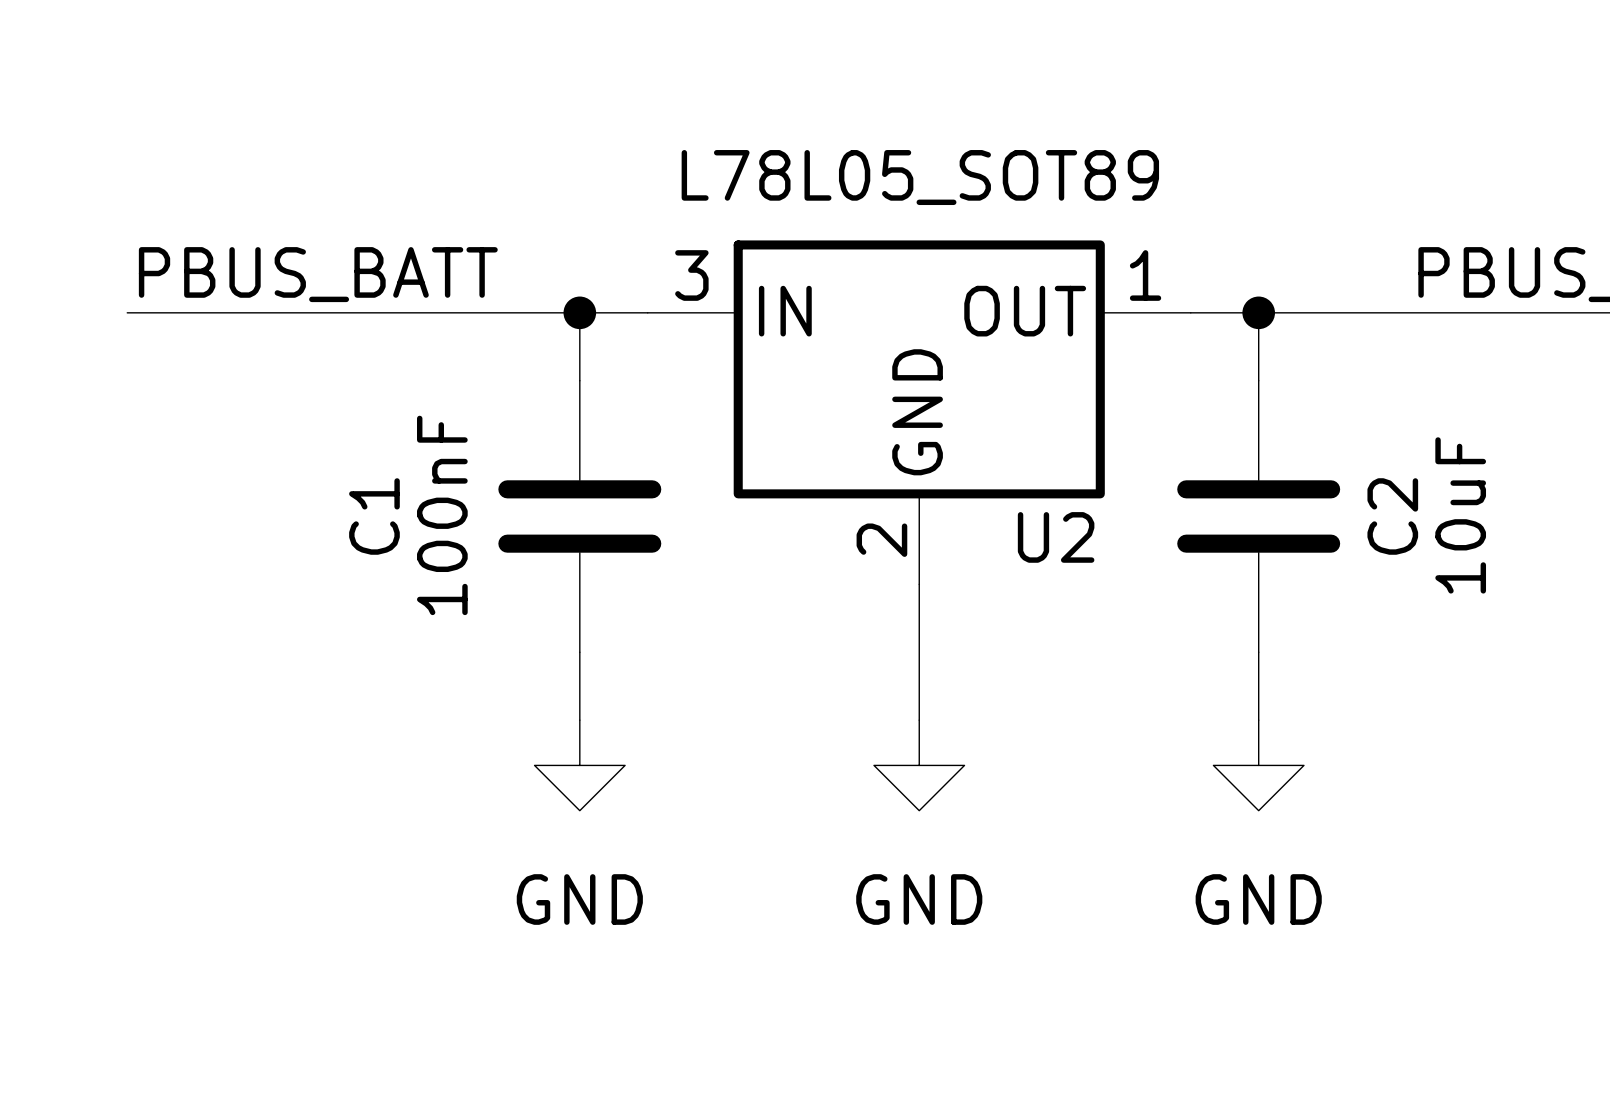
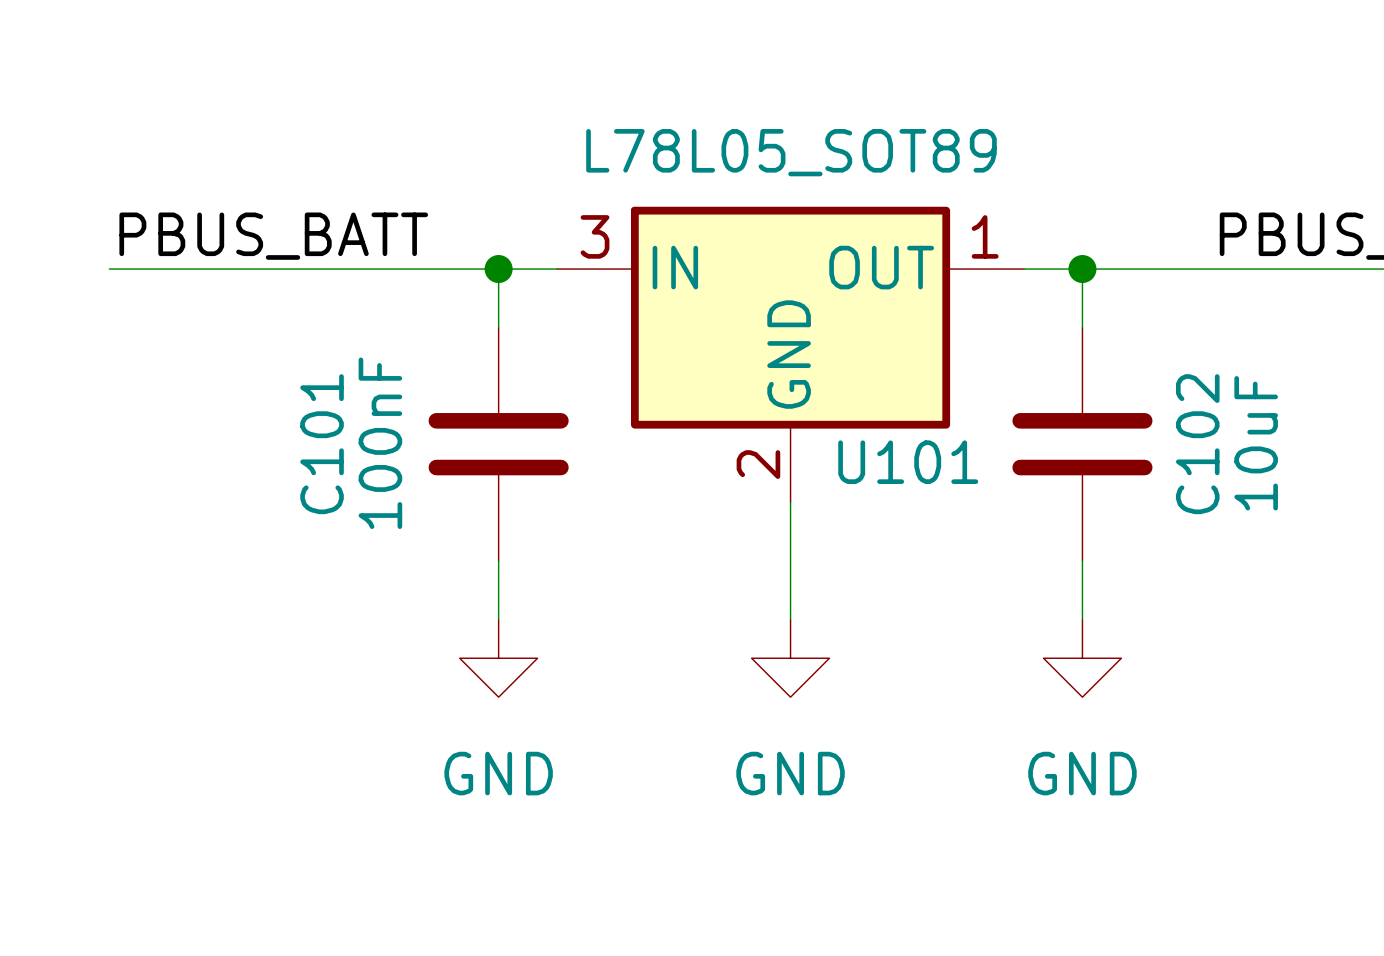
C1 name: C1 (374, 516) -> C101 (322, 444)
C2 name: C2 (1392, 516) -> C102 (1197, 444)
U2 name: U2 (1056, 537) -> U101 (908, 462)

